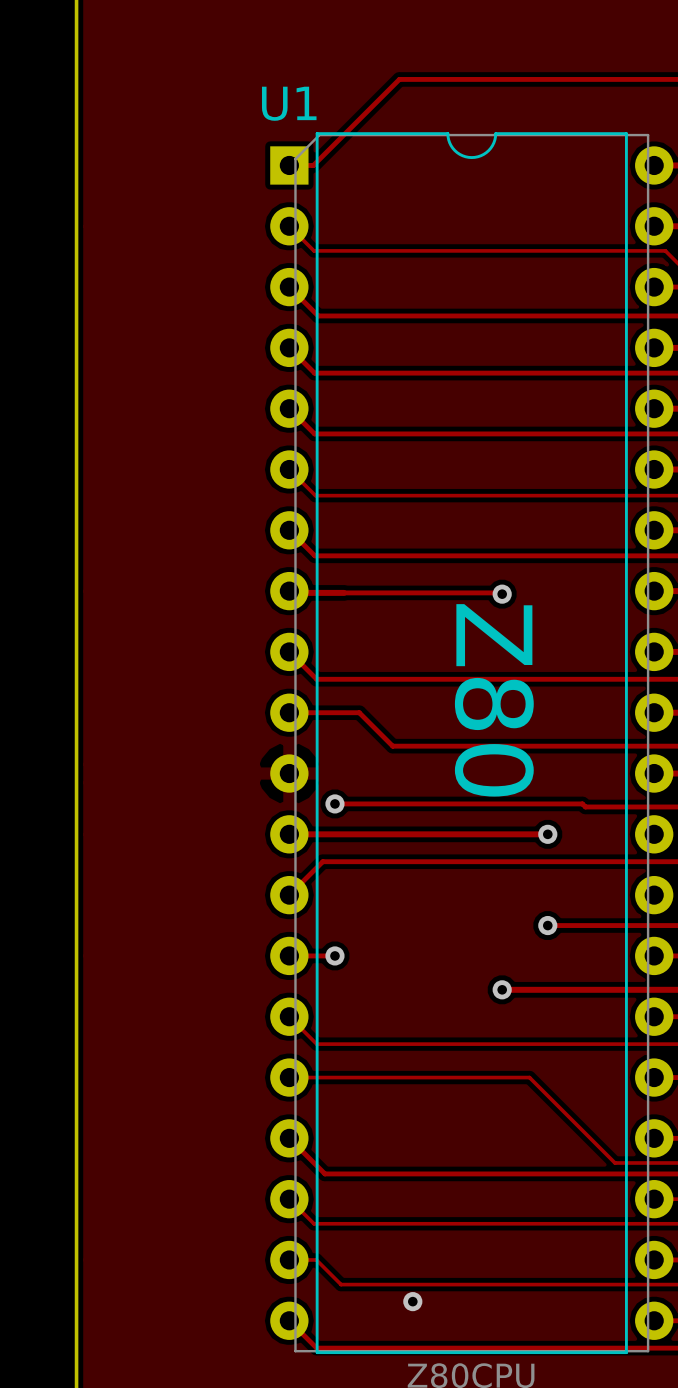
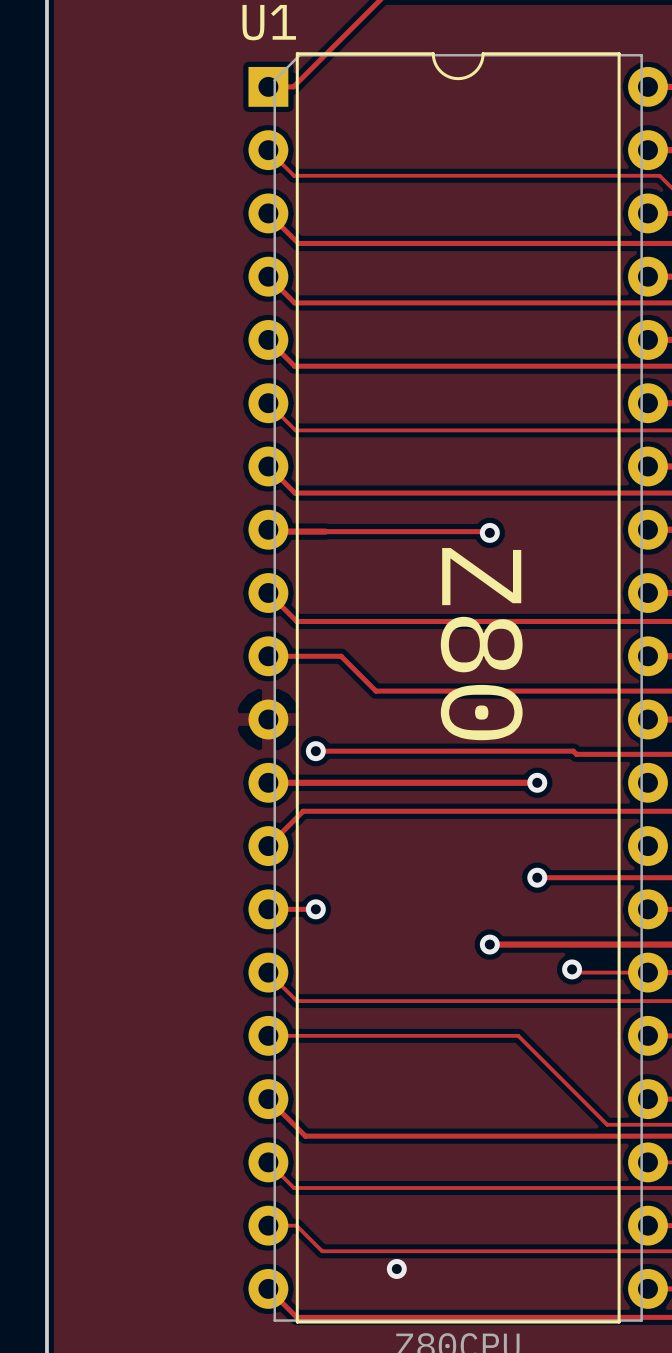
track: none -> (572, 969) (575, 972) (647, 972)
via: none -> (572, 969)

